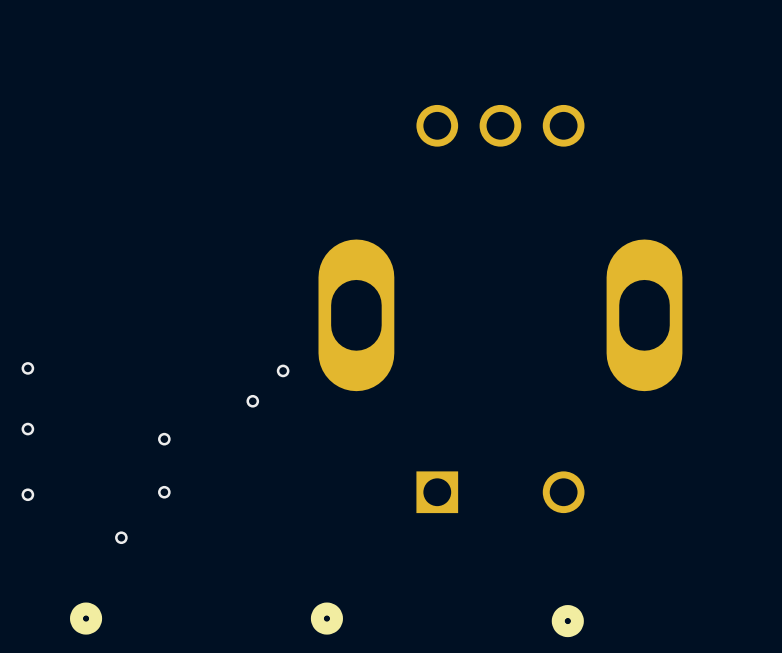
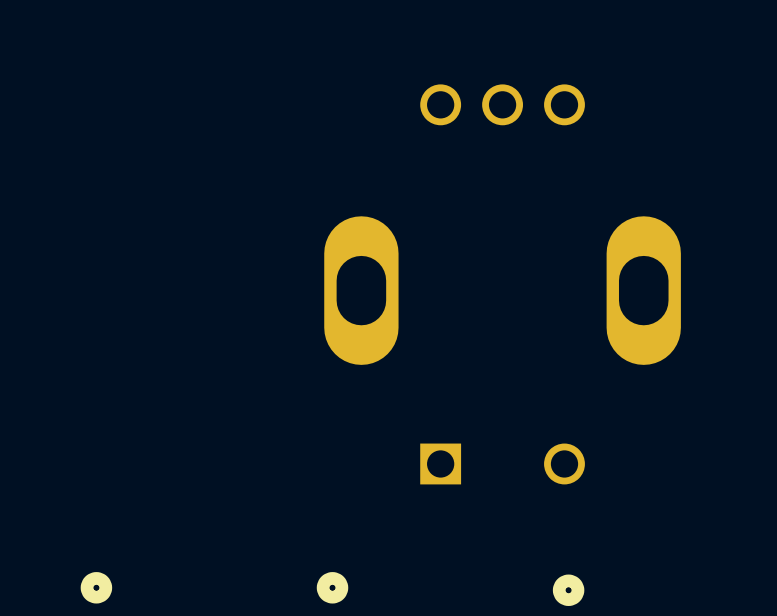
via: (27, 368) -> none
via: (283, 370) -> none
via: (252, 401) -> none
via: (27, 429) -> none
via: (164, 439) -> none
via: (164, 492) -> none
via: (27, 494) -> none
via: (121, 537) -> none

